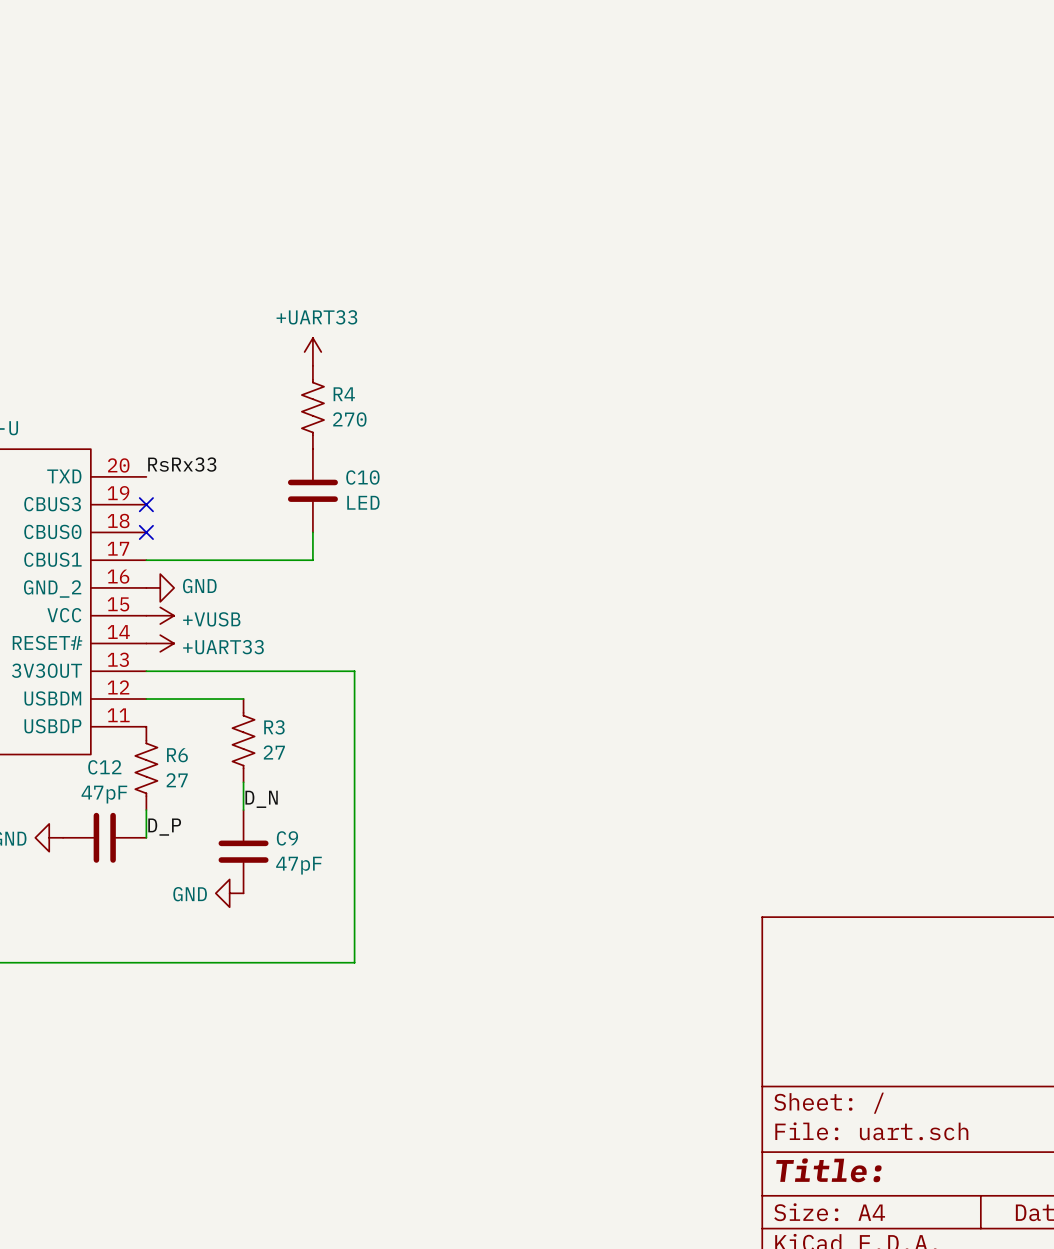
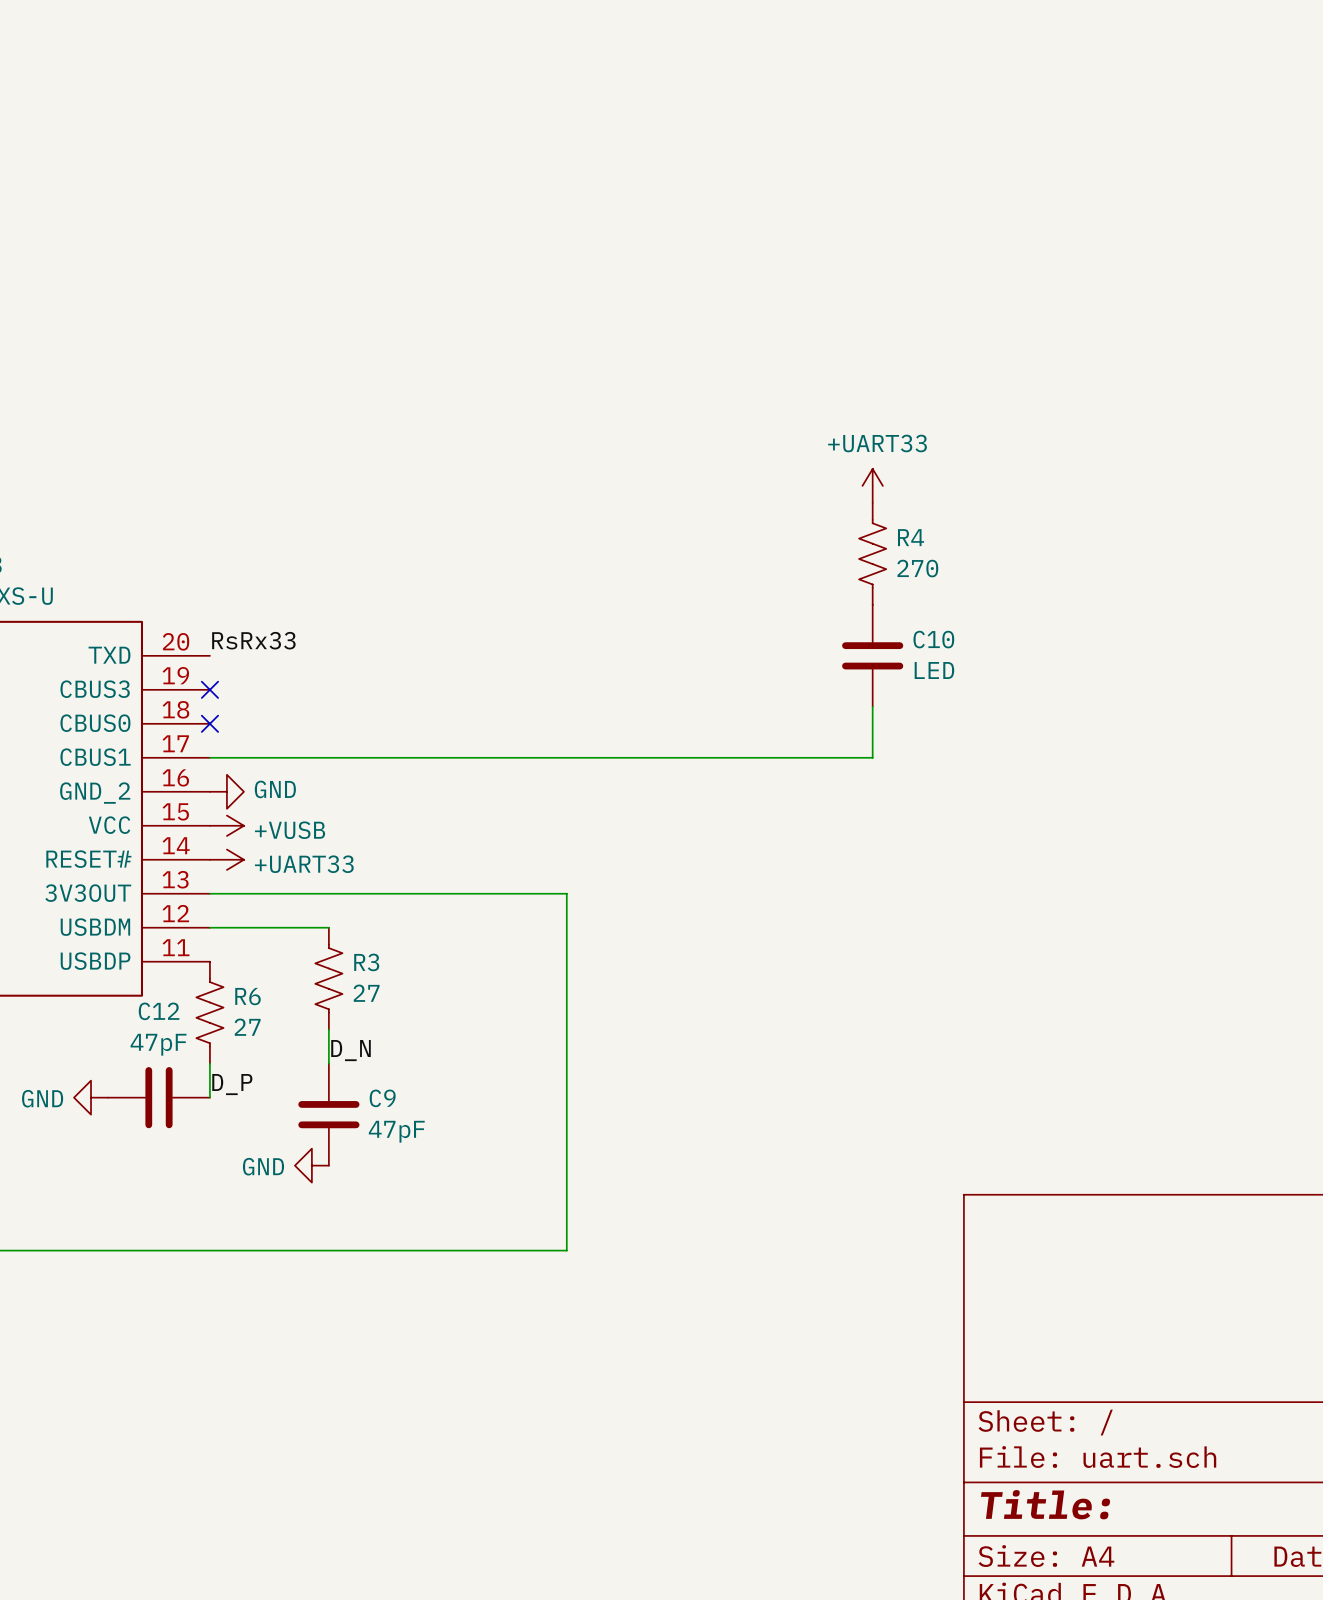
power symbol: none -> +UART33 (872, 485)
power symbol: +UART33 (312, 352) -> none
R4 position: (312, 407) -> (872, 553)
C10 position: (312, 490) -> (872, 655)
wire: (312, 532) (312, 560) -> (872, 706) (872, 757) (413, 757)
wire: (354, 671) (354, 962) -> (464, 893) (566, 893) (566, 1250) (464, 1250)

